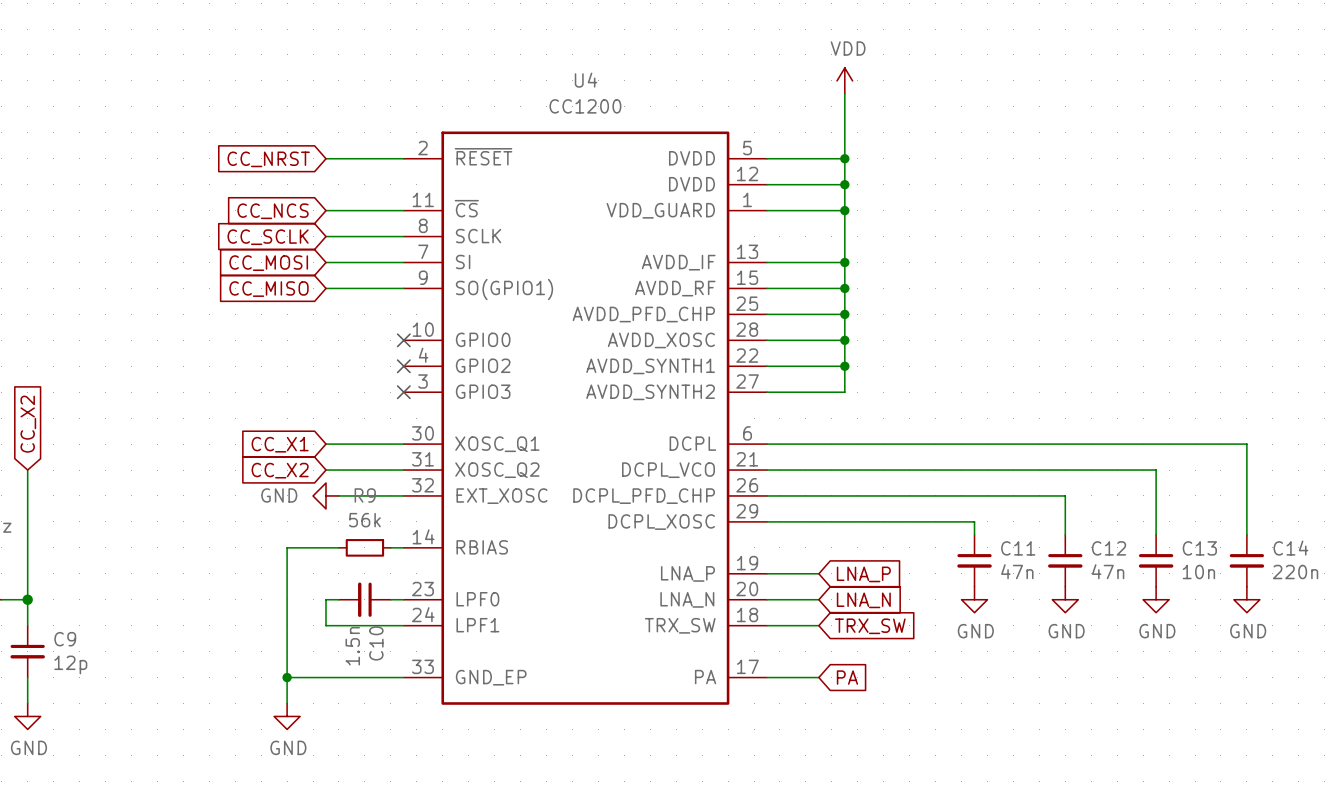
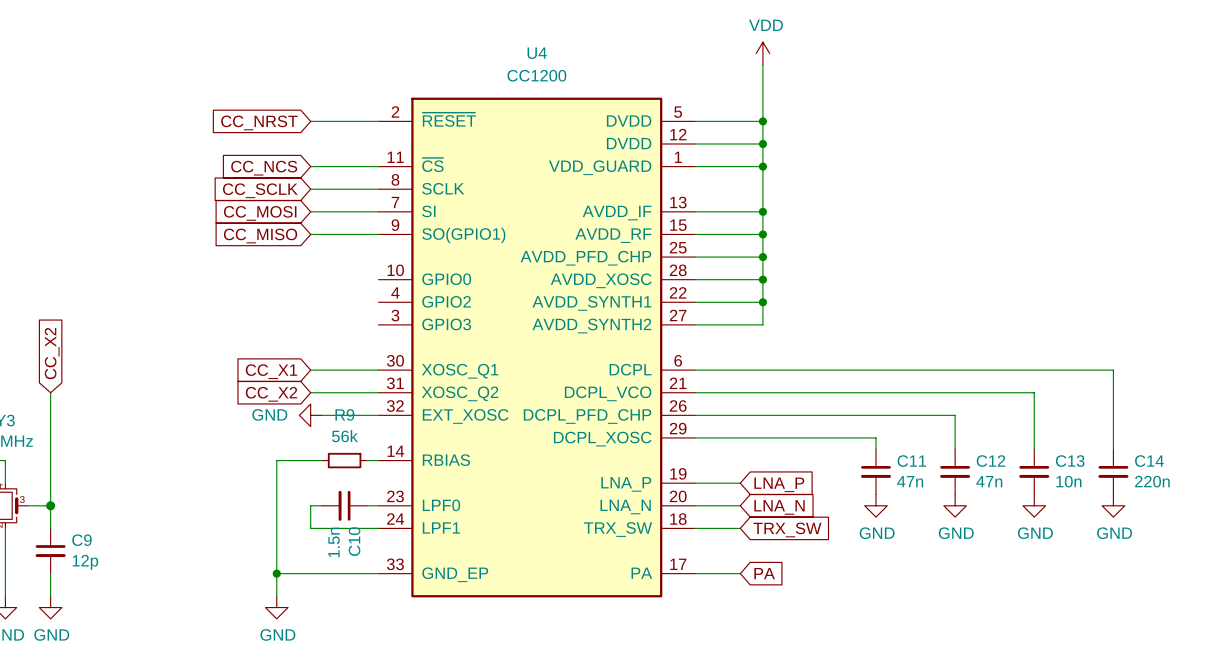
no-connect mark: (403, 340) -> none
no-connect mark: (403, 366) -> none
no-connect mark: (403, 392) -> none

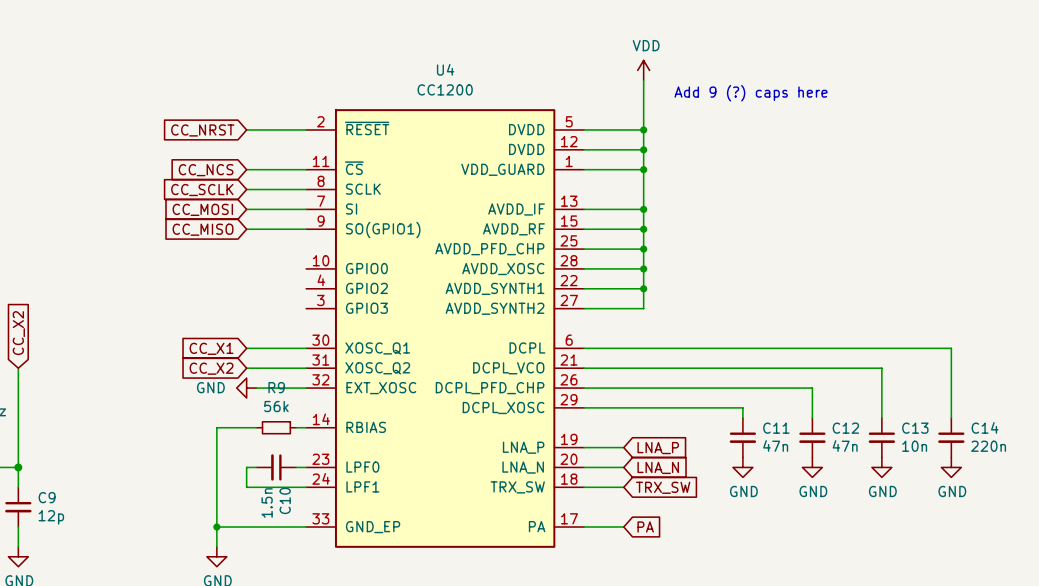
text: none -> Add 9 (?) caps here (751, 93)

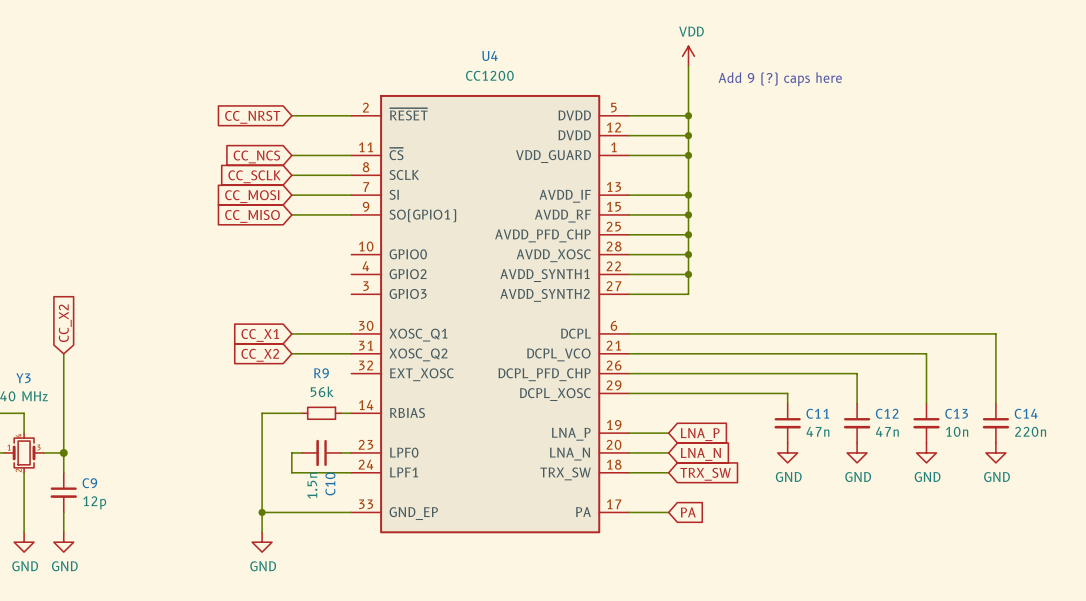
power symbol: GND (246, 388) -> none
wire: (256, 388) (306, 388) -> none

